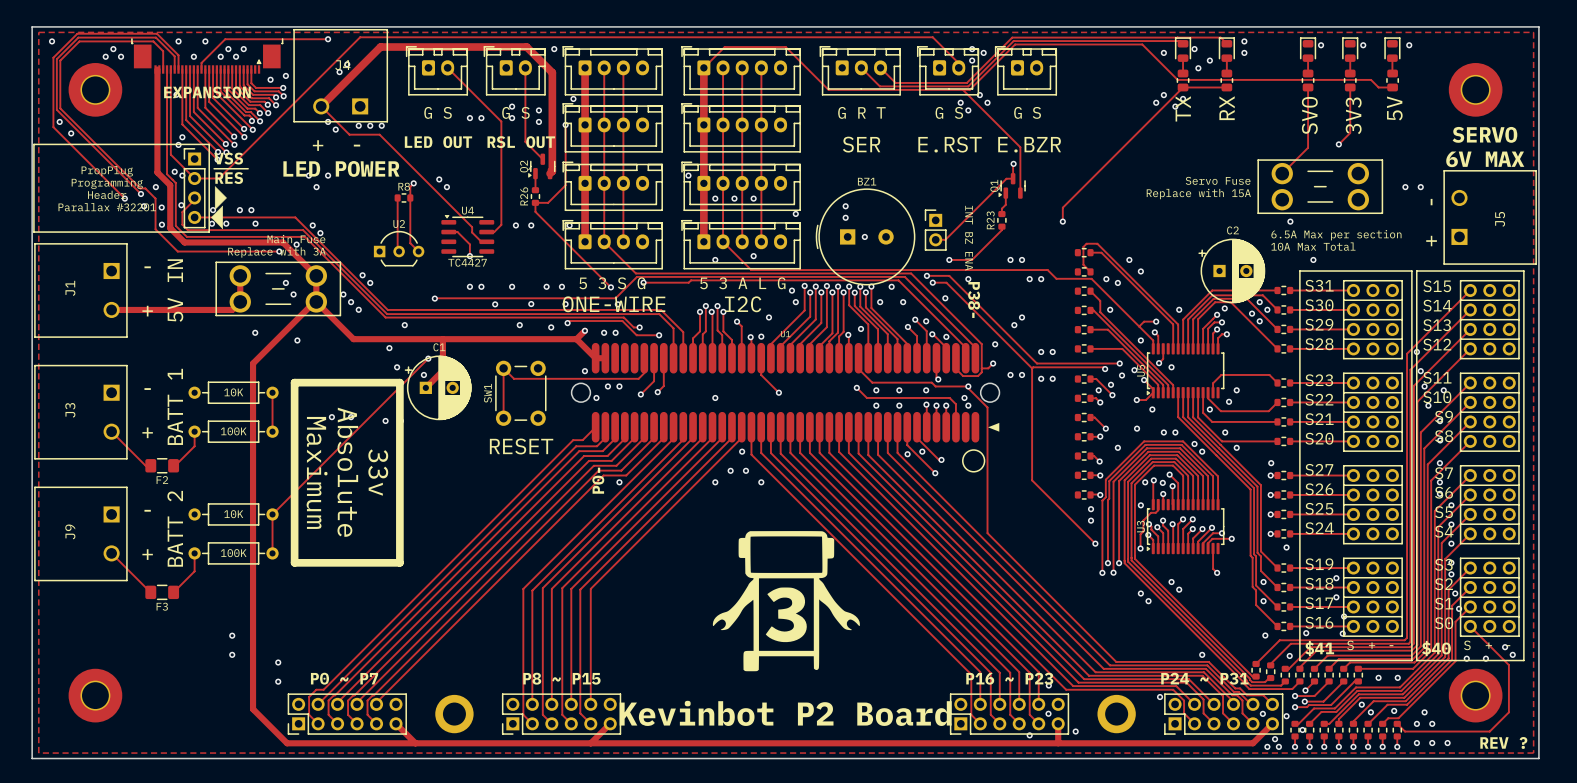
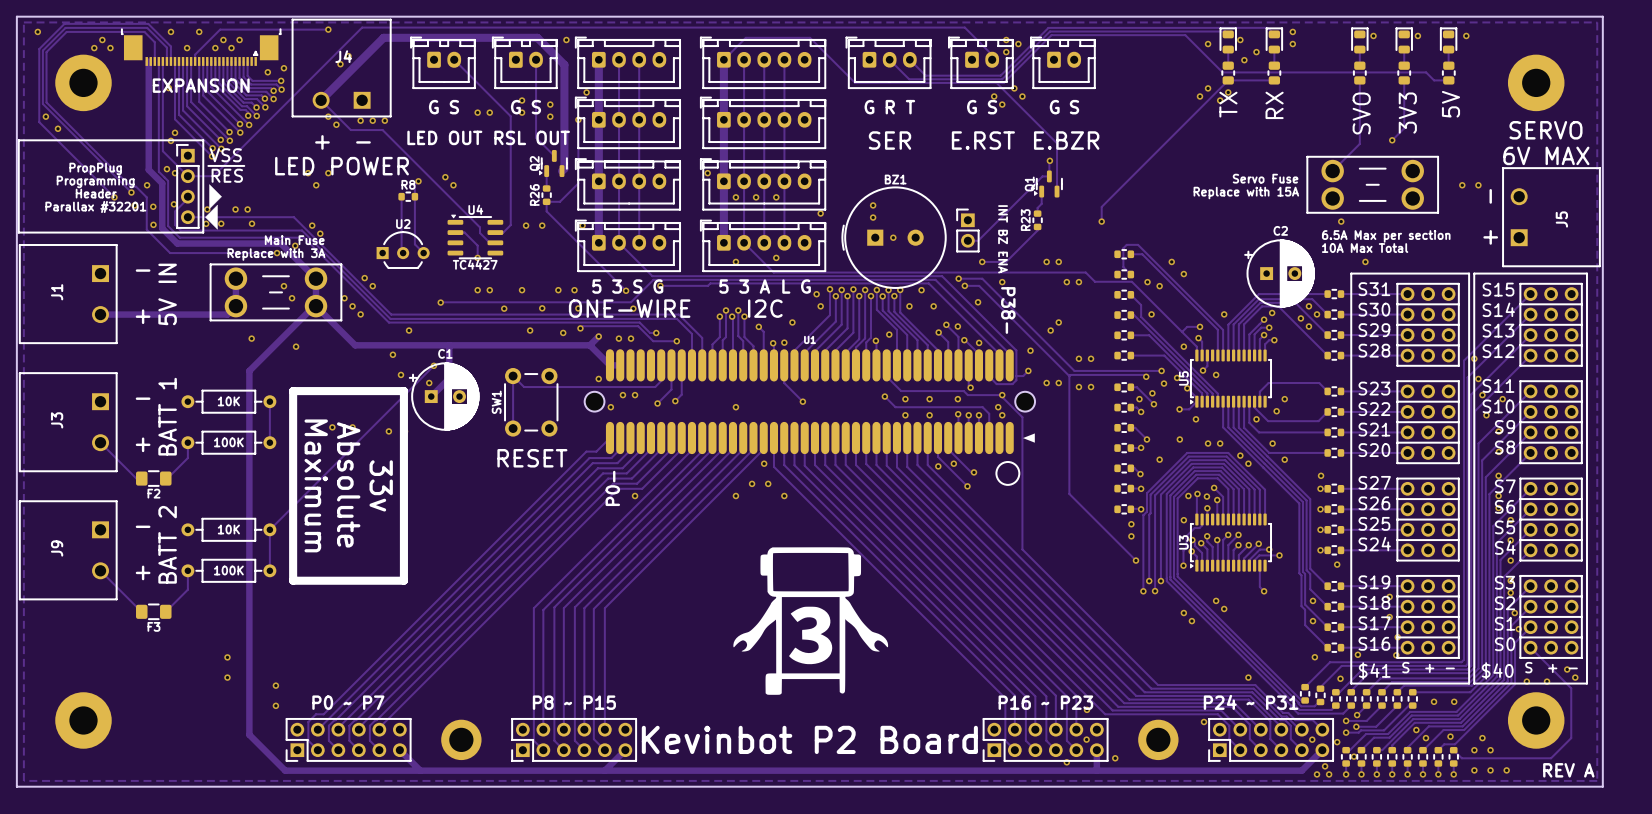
text: REV ? (1503, 742) -> REV A (1568, 770)

